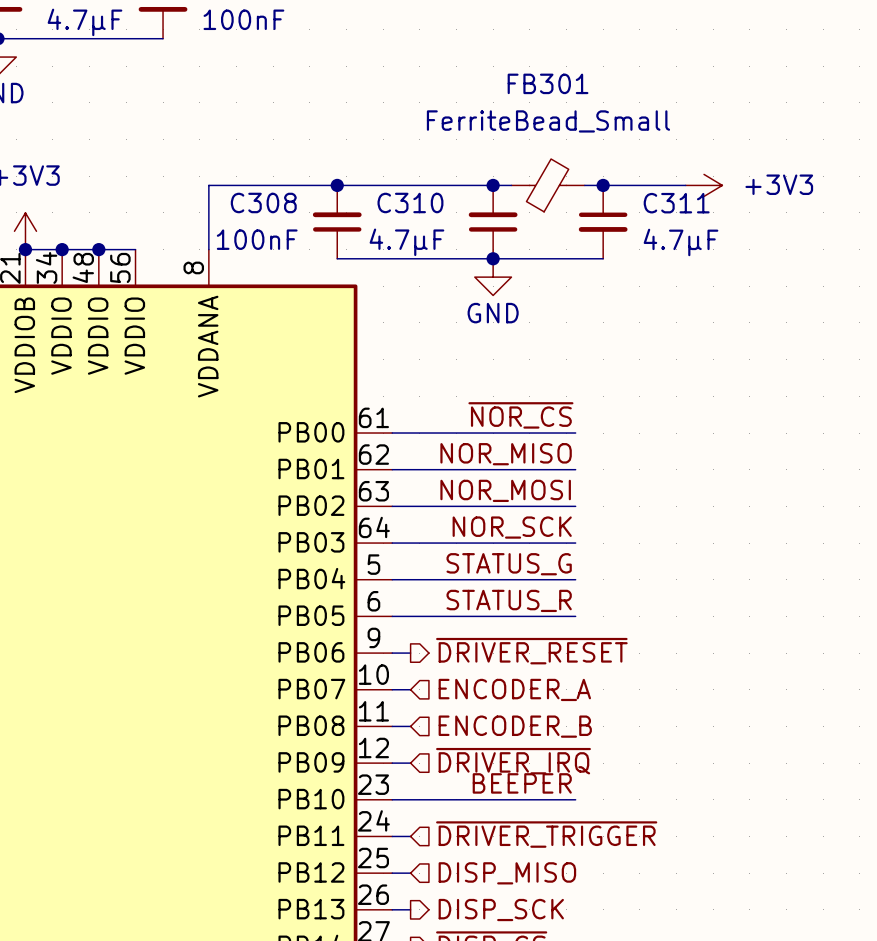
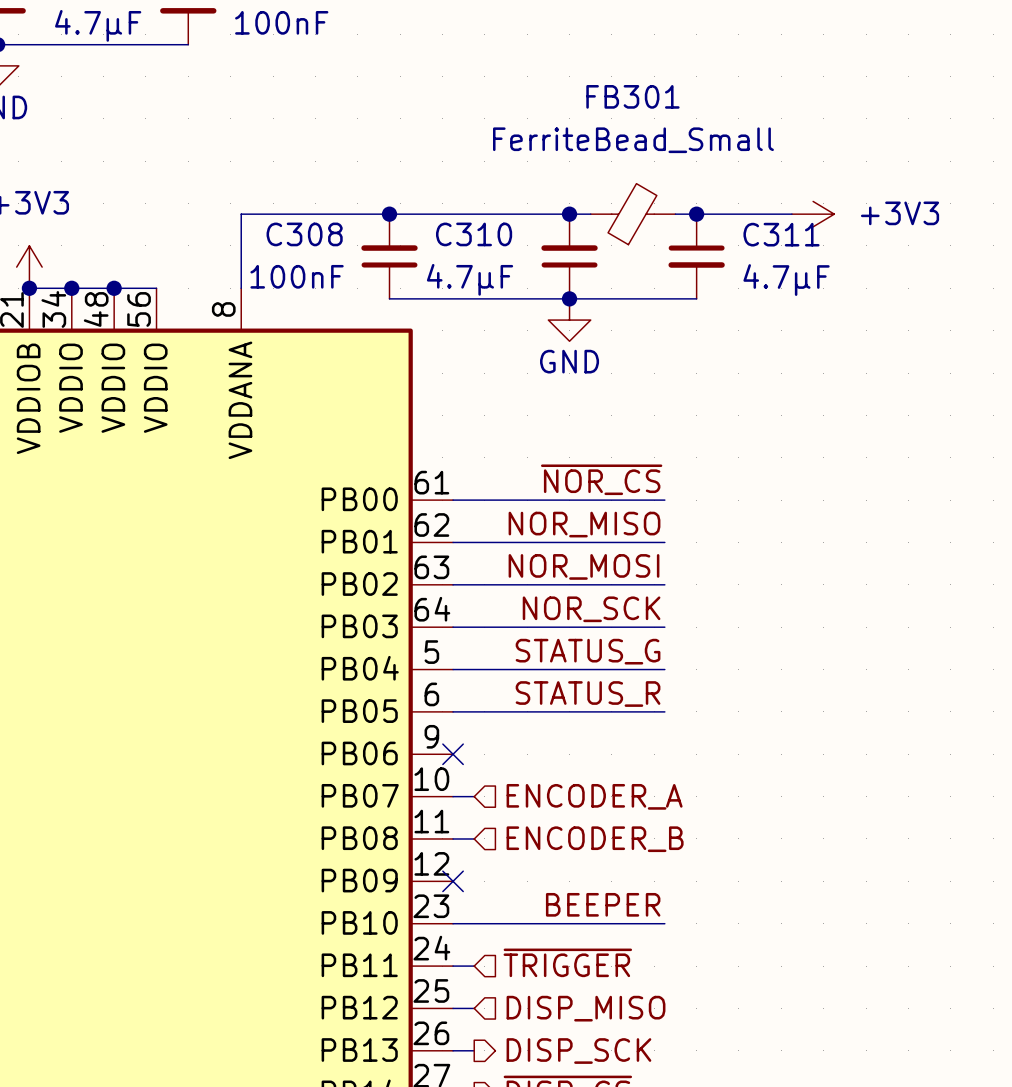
hierarchical label: ~{DRIVER_RESET} (531, 651) -> none
wire: (392, 653) (410, 653) -> none
no-connect mark: none -> (453, 754)
hierarchical label: ~{DRIVER_IRQ} (513, 761) -> none
wire: (392, 763) (410, 763) -> none
no-connect mark: none -> (453, 881)
hierarchical label: ~{DRIVER_TRIGGER} (546, 834) -> ~{TRIGGER} (567, 962)

